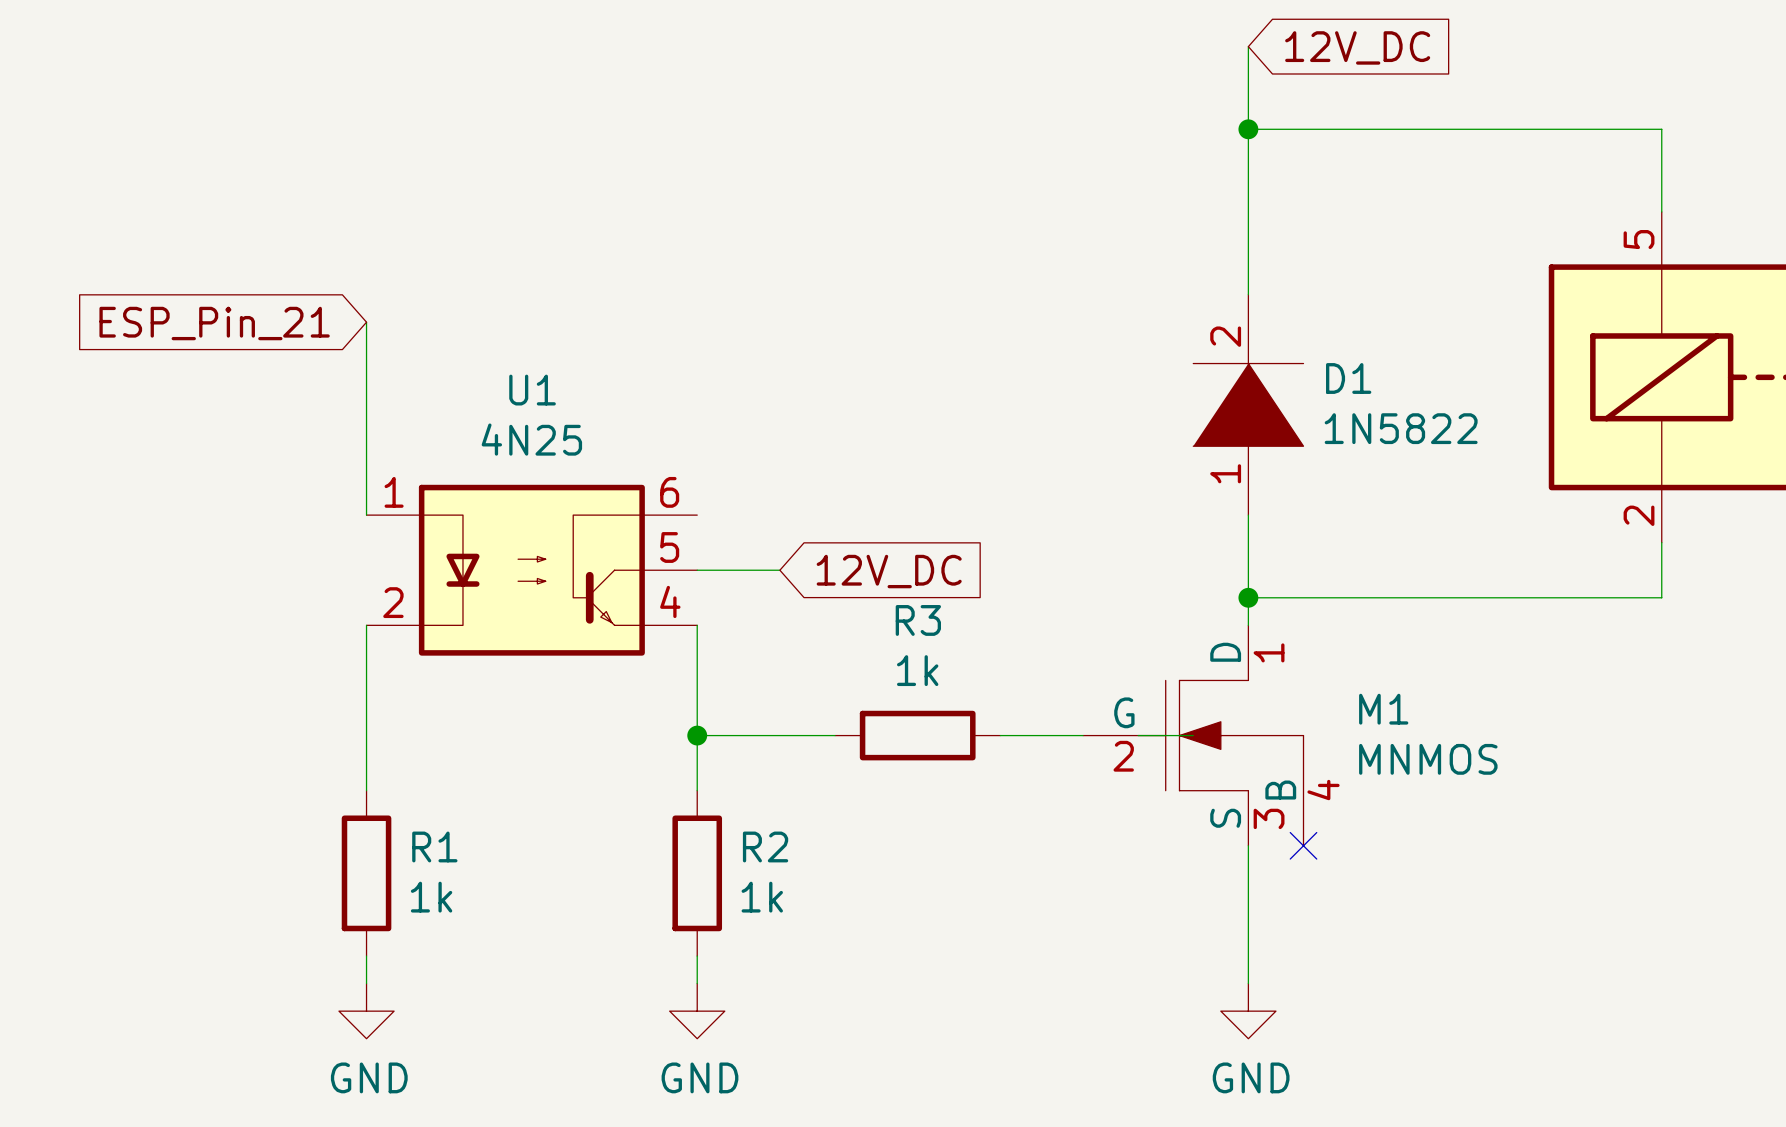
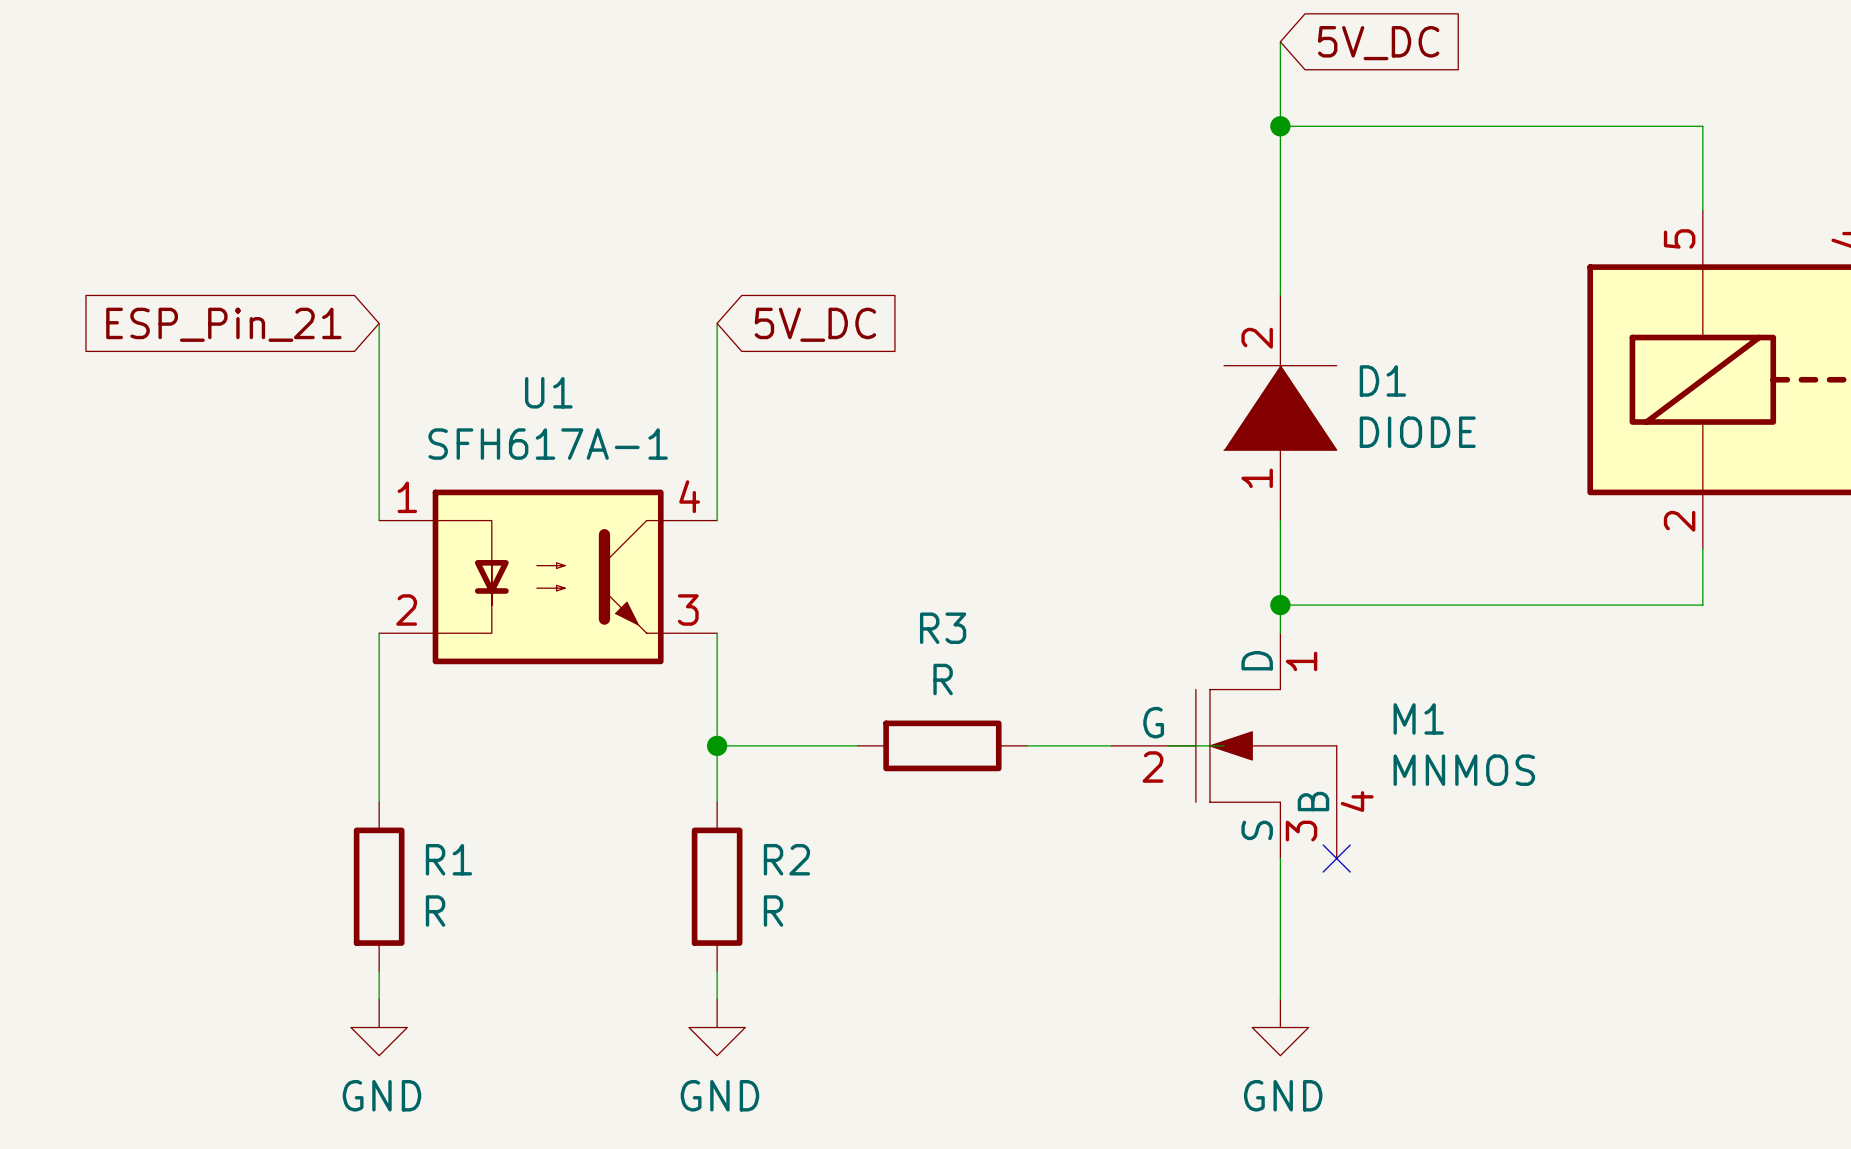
global label: 12V_DC (1357, 47) -> 5V_DC (1378, 43)
wire: none -> (717, 323) (717, 520)
global label: none -> 5V_DC (815, 324)
D1 value: 1N5822 (1401, 428) -> DIODE (1417, 432)
U1 value: 4N25 (531, 439) -> SFH617A-1 (548, 444)
U1 symbol: [366, 484, 698, 656] -> [379, 489, 718, 665]
wire: (697, 570) (779, 570) -> none
global label: 12V_DC (889, 571) -> none
R3 value: 1k (917, 670) -> R (943, 679)
R1 value: 1k (431, 897) -> R (435, 911)
R2 value: 1k (762, 897) -> R (773, 911)

